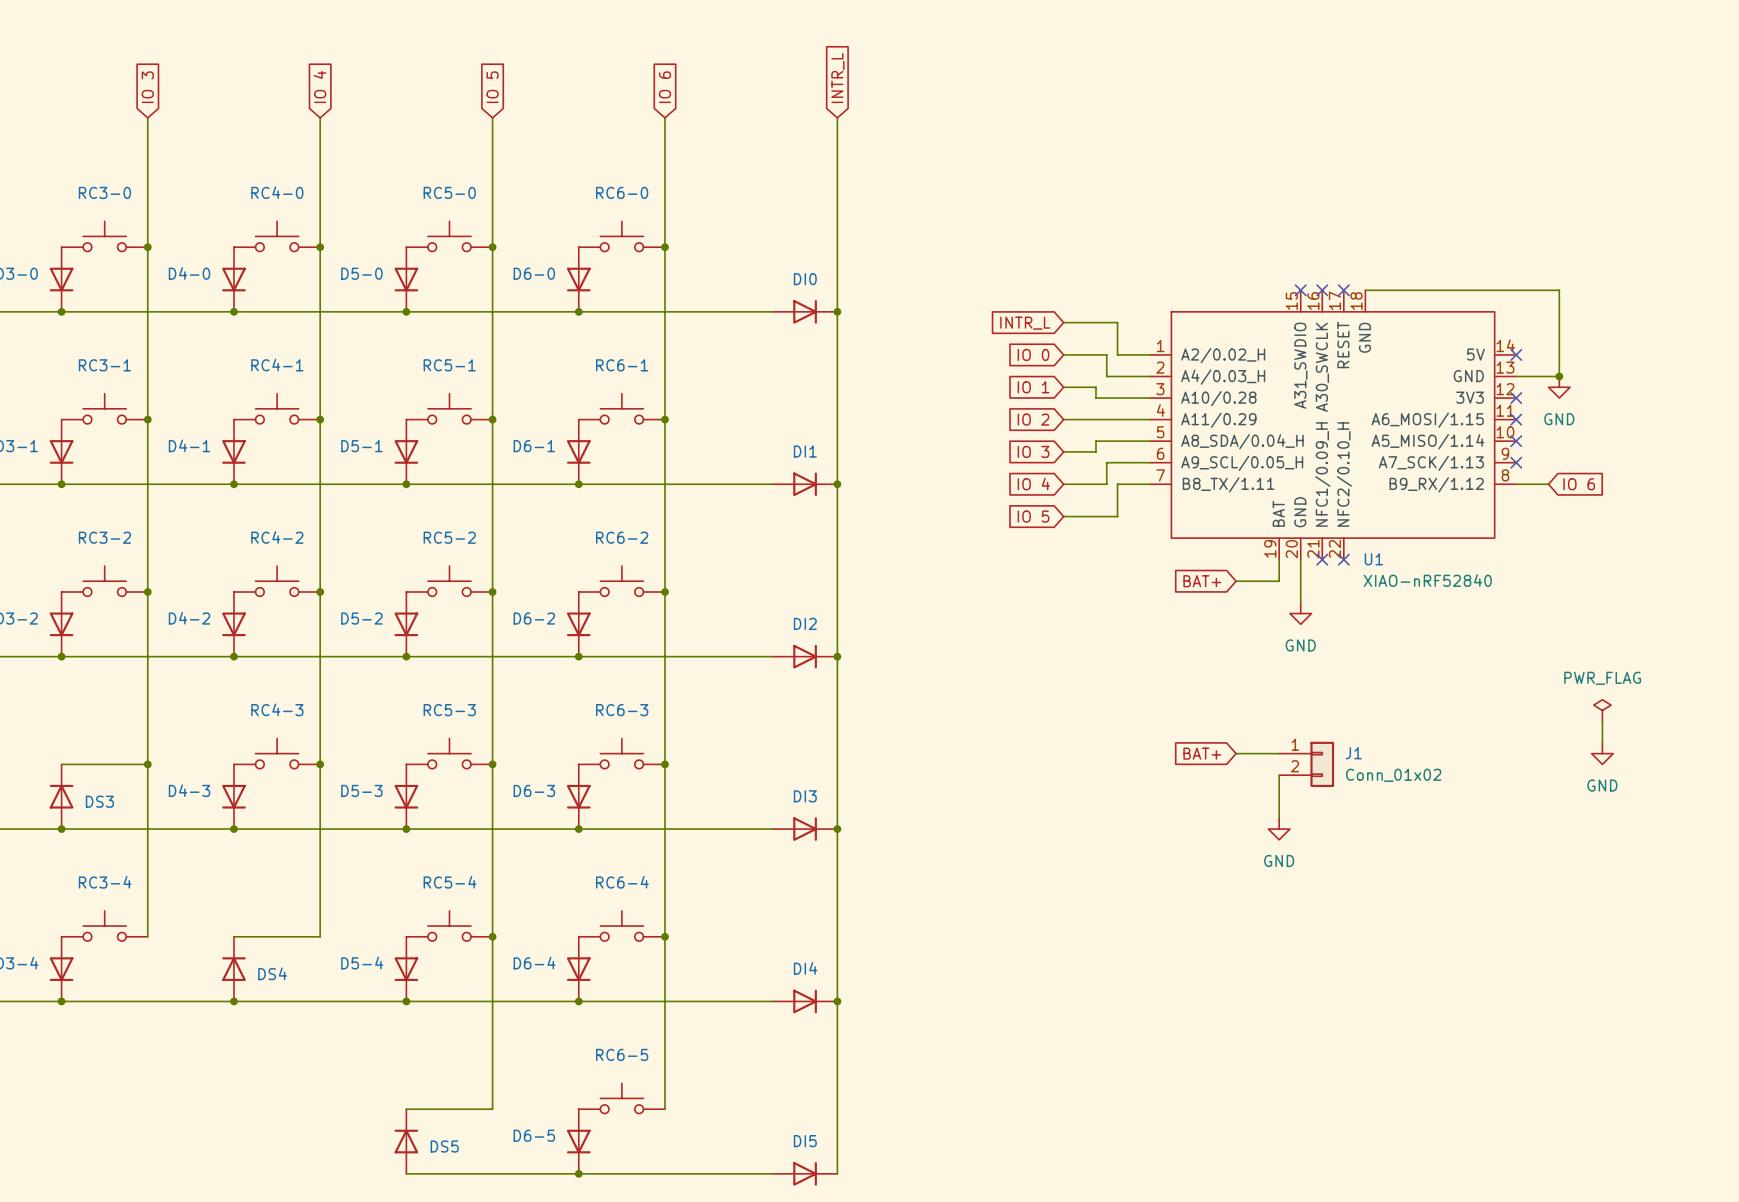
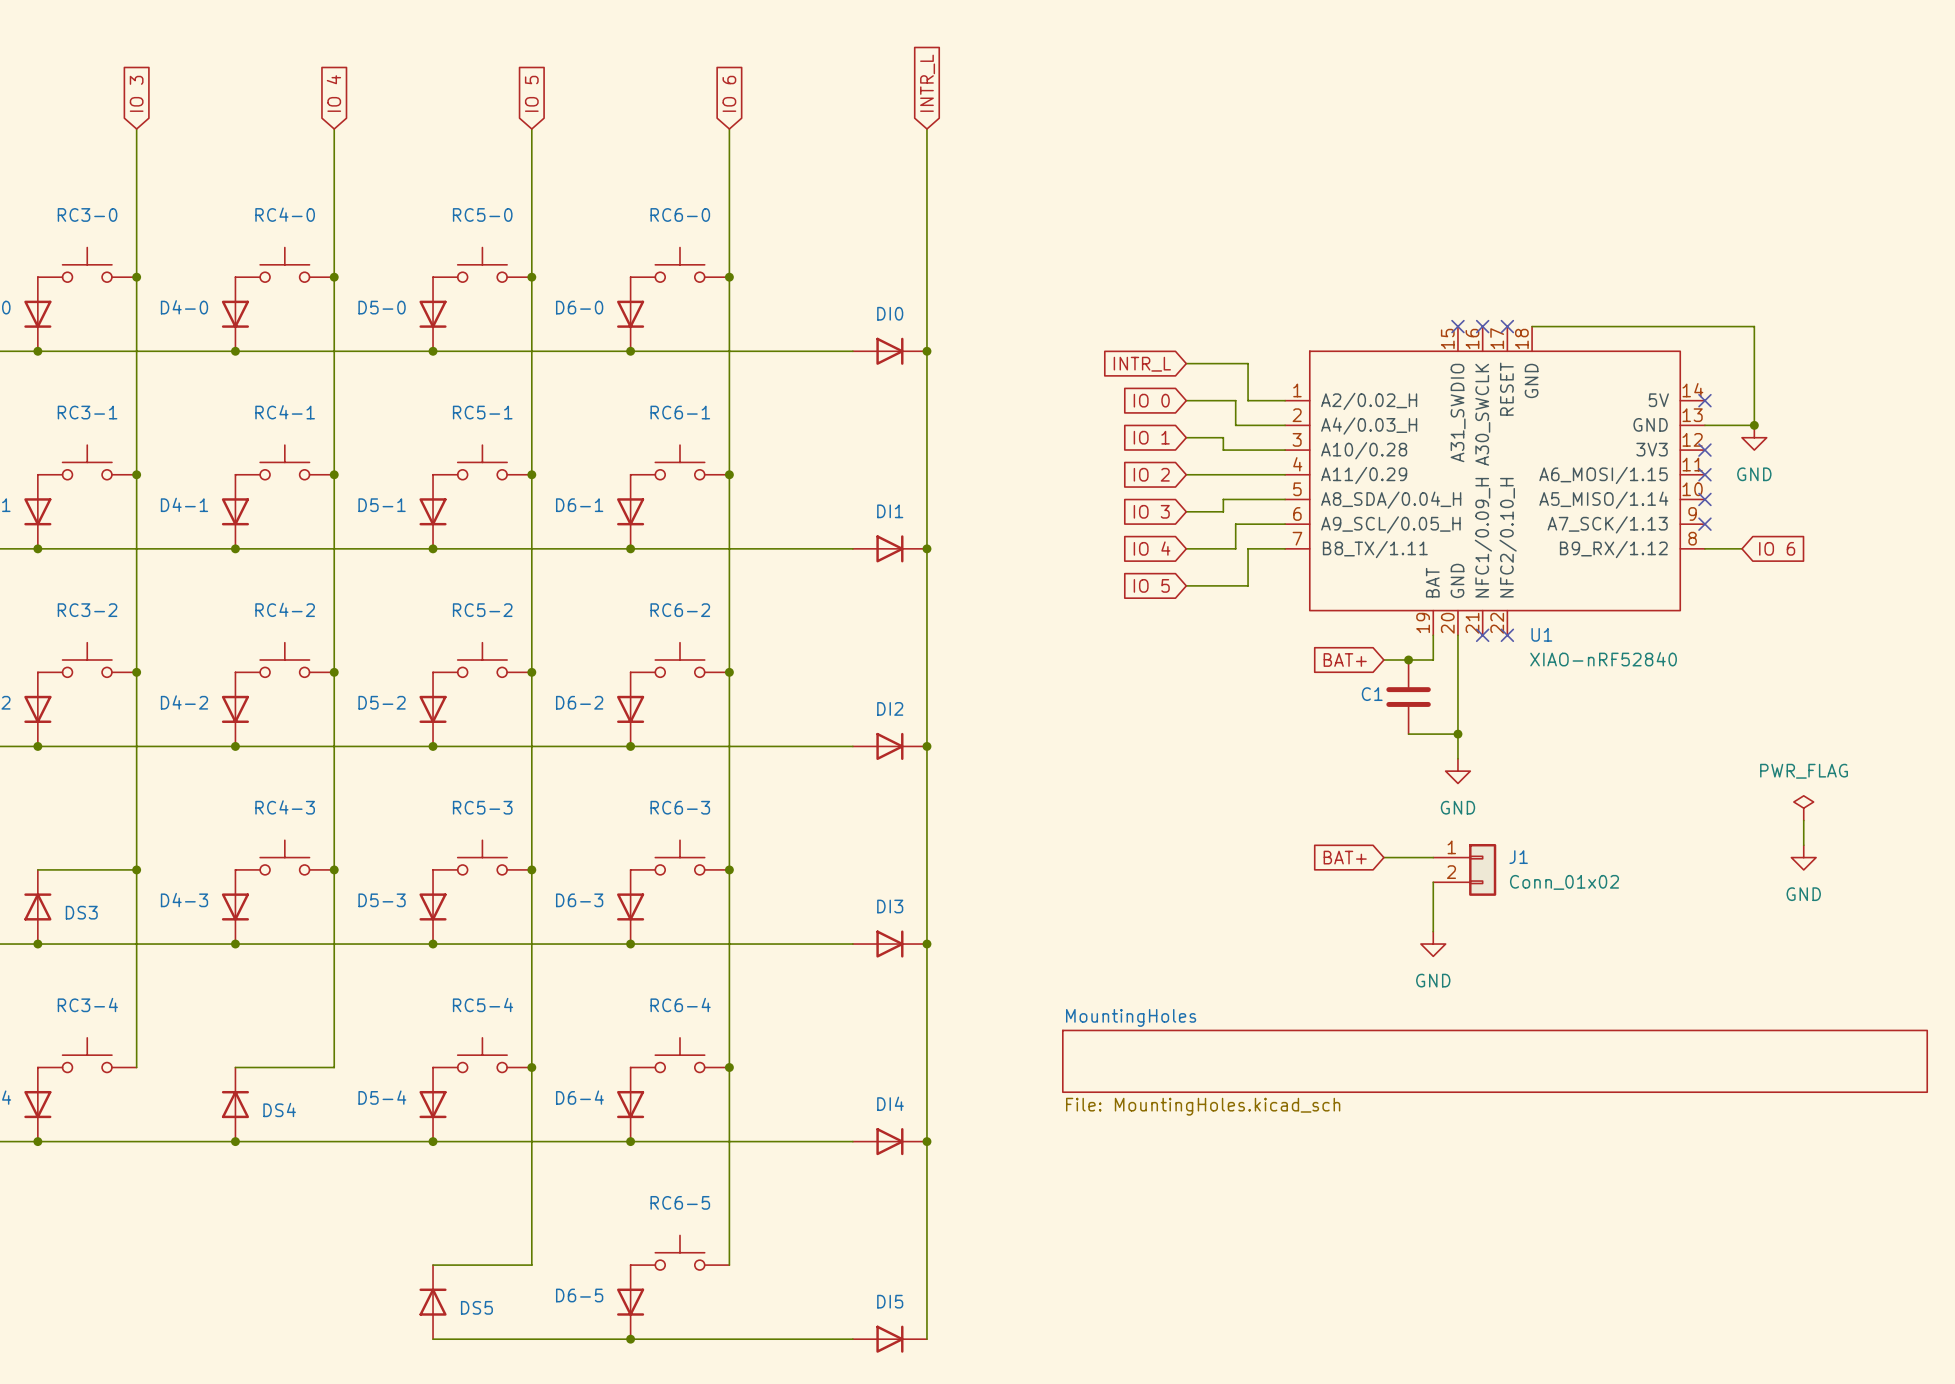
junction: none -> (1408, 659)
wire: none -> (1457, 684) (1457, 758)
C1: none -> (1408, 697)
power symbol position: GND (1300, 613) -> GND (1457, 771)
wire: none -> (1408, 734) (1457, 734)
junction: none -> (1457, 734)
sheet MountingHoles: none -> File: MountingHoles.kicad_sch (1495, 1061)

